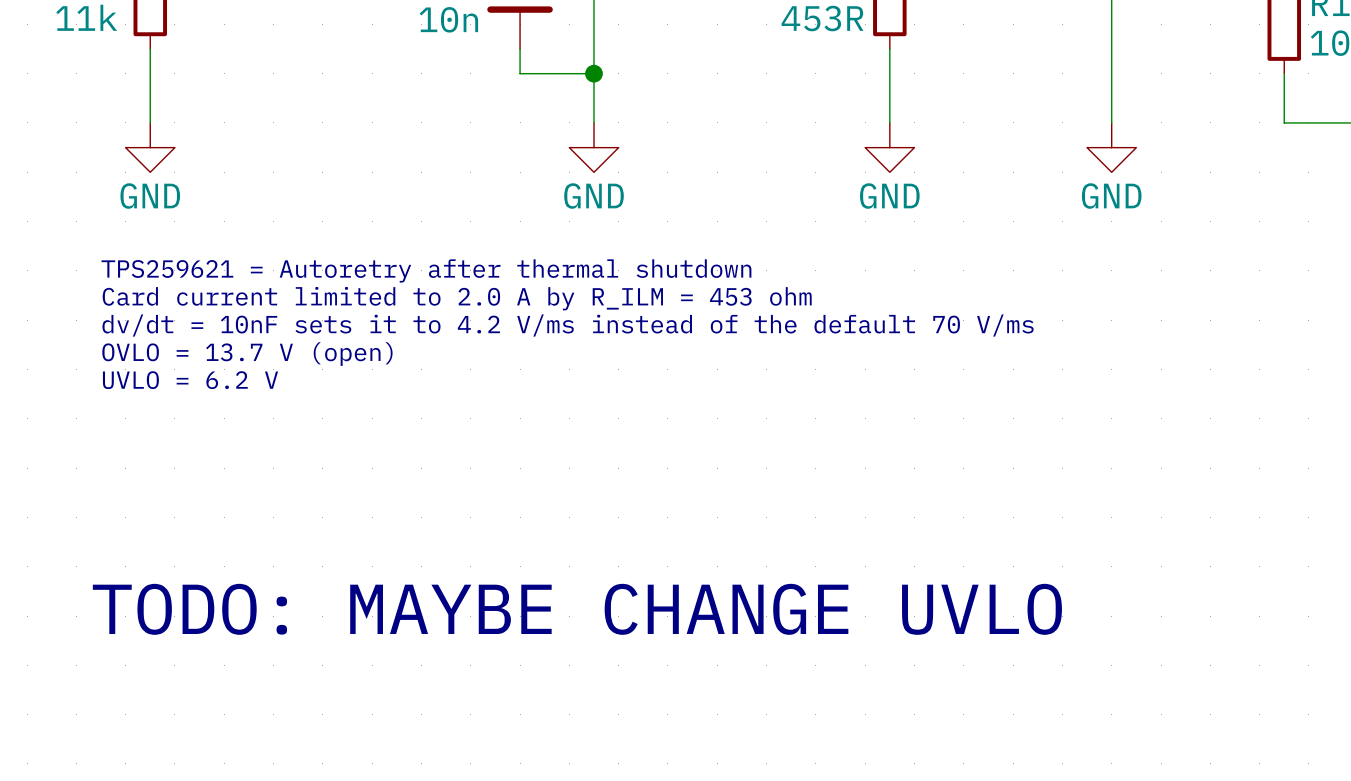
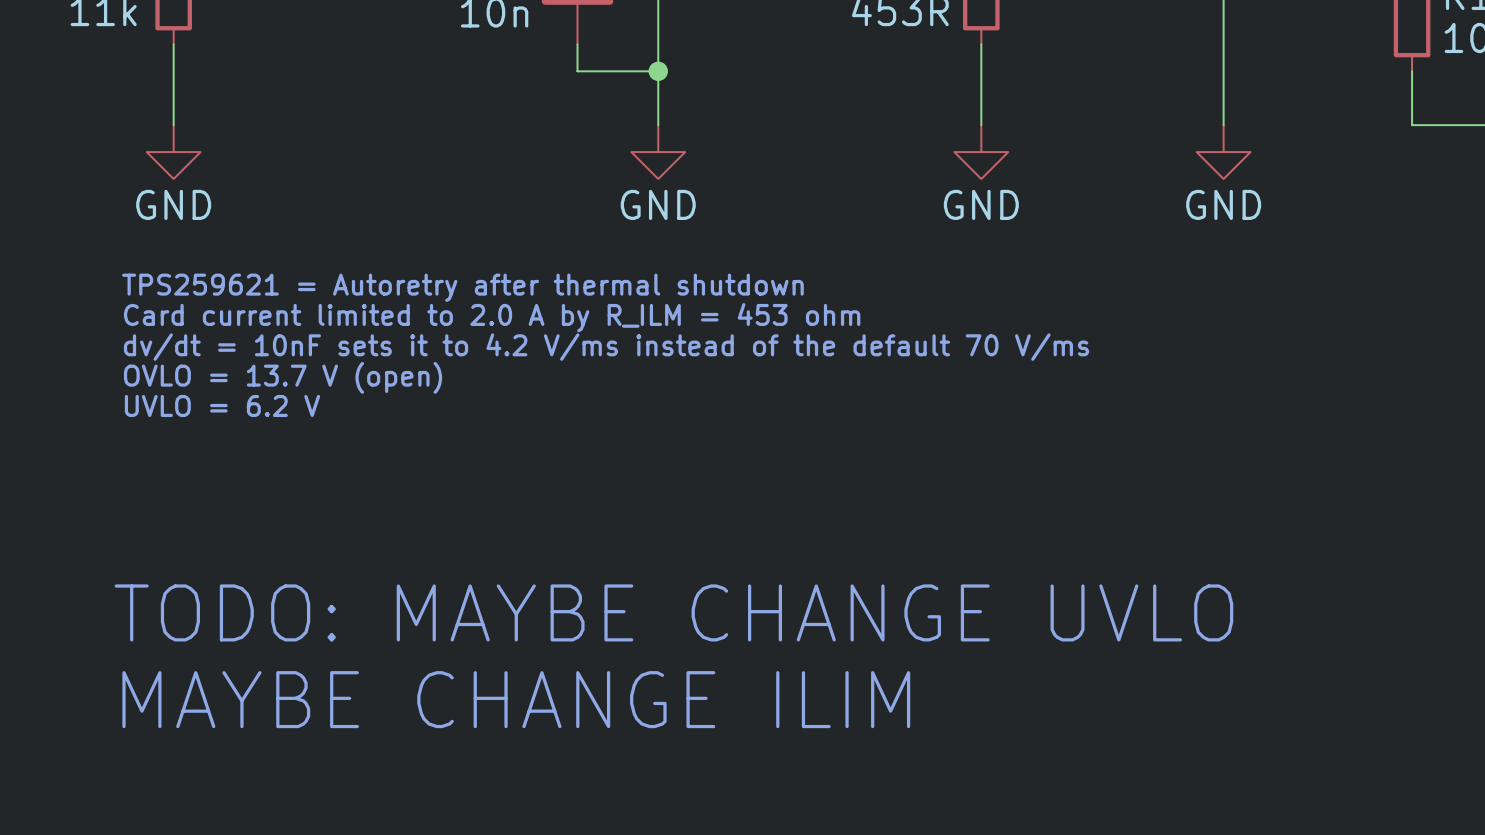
text position: TODO: MAYBE CHANGE UVLO (577, 609) -> TODO: MAYBE CHANGE UVLO (673, 612)
text: none -> MAYBE CHANGE ILIM (516, 699)

